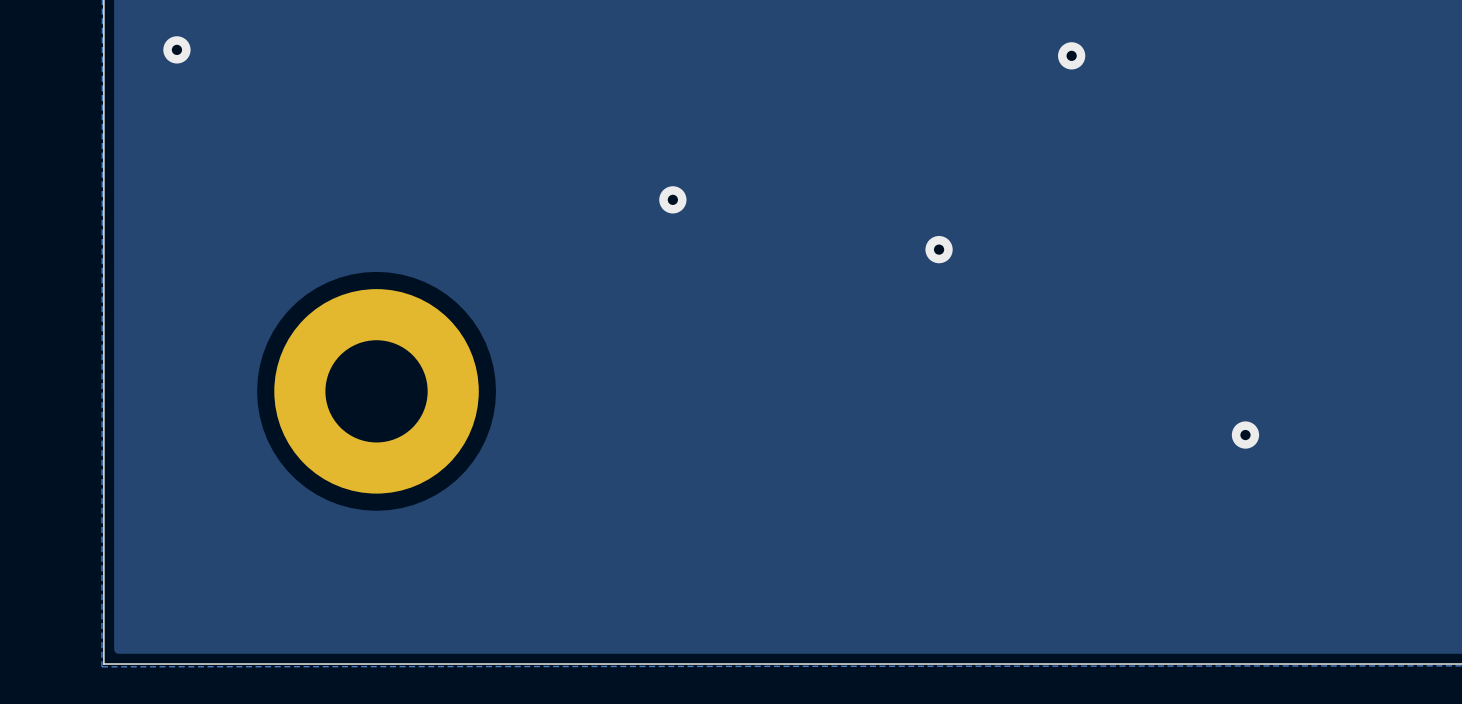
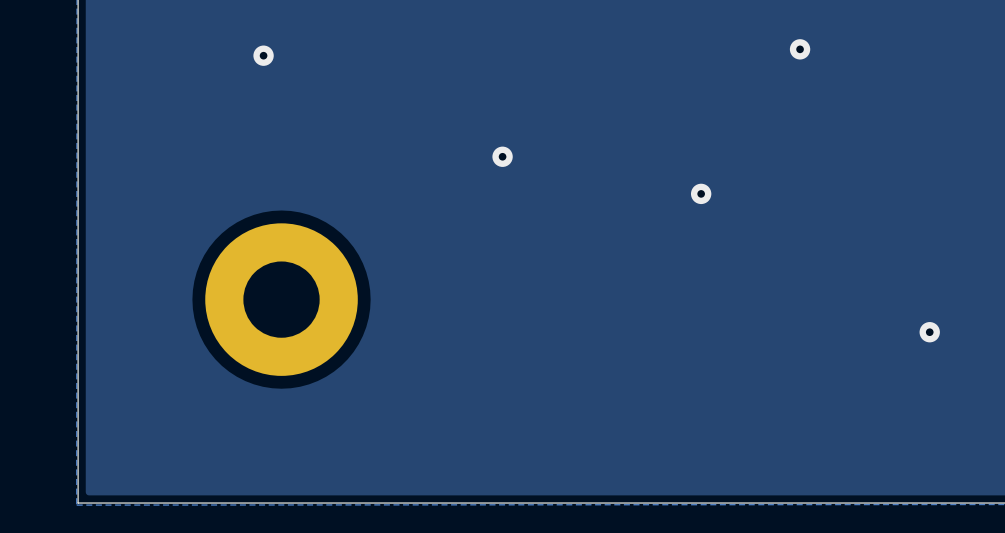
via position: (176, 49) -> (263, 55)

